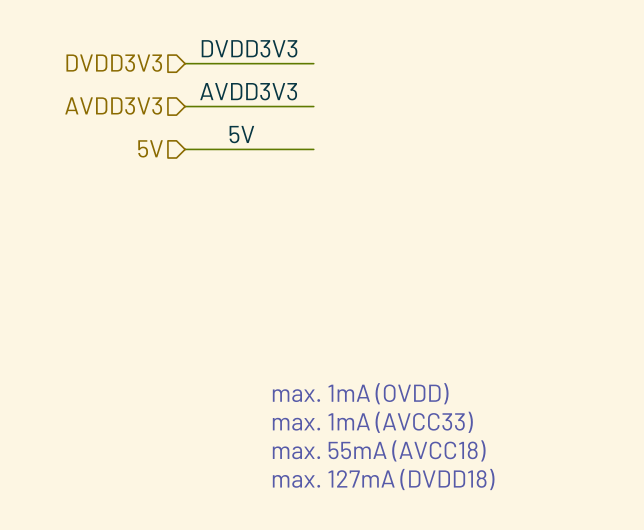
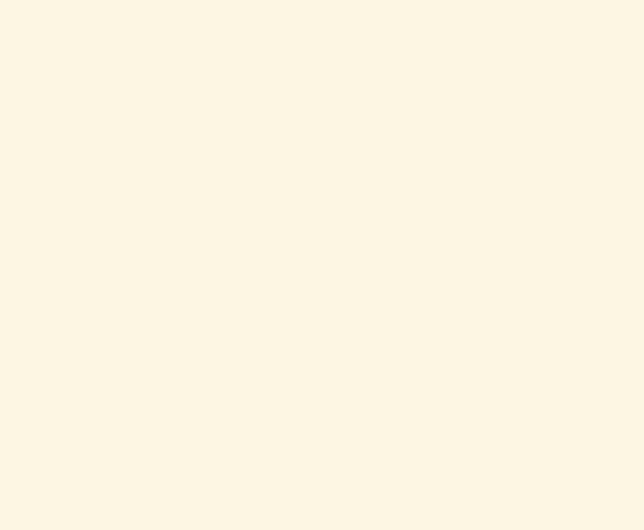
label: DVDD3V3 (249, 48) -> none
hierarchical label: DVDD3V3 (114, 63) -> none
wire: (185, 63) (313, 63) -> none
label: AVDD3V3 (248, 91) -> none
hierarchical label: AVDD3V3 (113, 106) -> none
wire: (185, 106) (313, 106) -> none
label: 5V (241, 134) -> none
hierarchical label: 5V (150, 148) -> none
wire: (185, 149) (313, 149) -> none
text: max. 1mA (OVDD) (360, 393) -> none
text: max. 1mA (AVCC33) (372, 422) -> none
text: max. 55mA (AVCC18) (379, 450) -> none
text: max. 127mA (DVDD18) (383, 479) -> none

